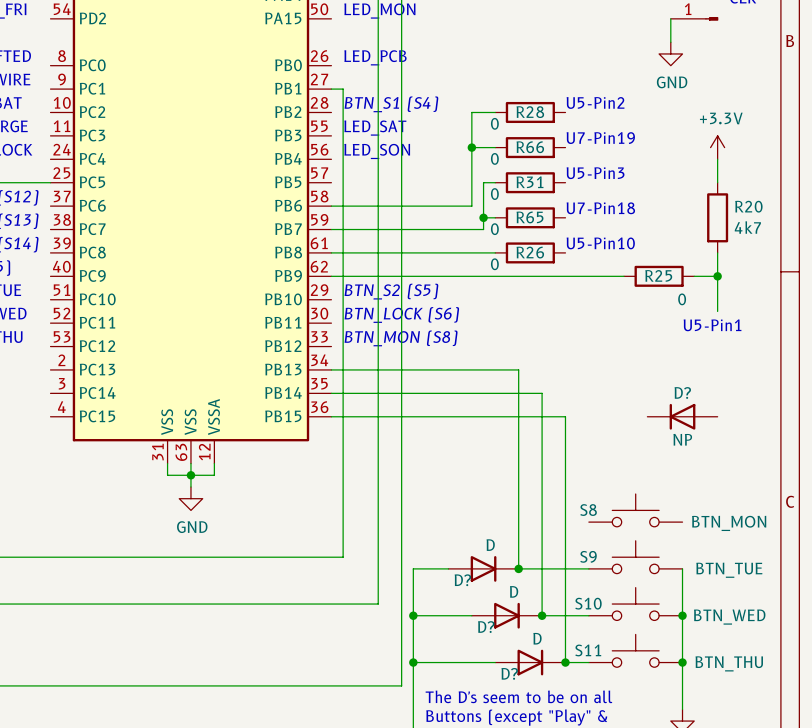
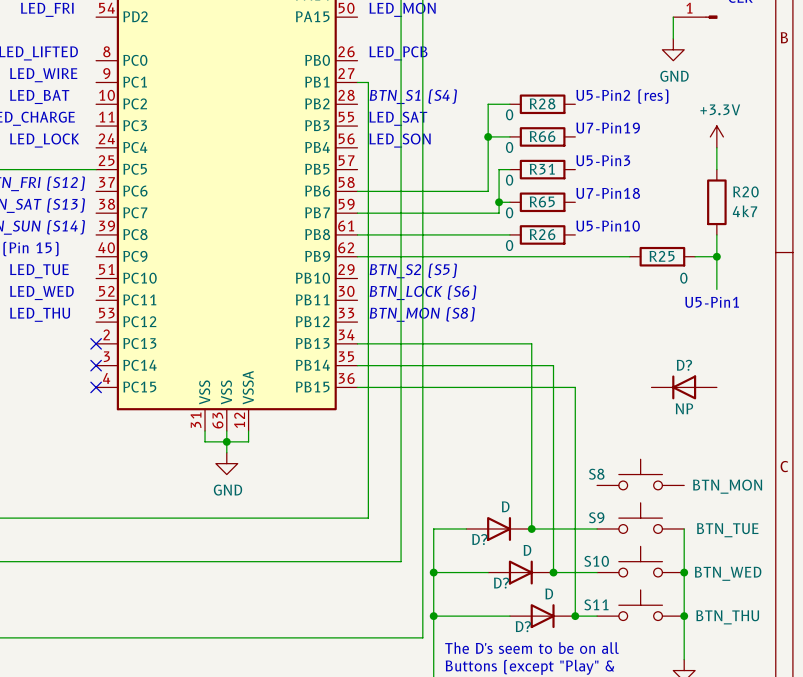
text: U5-Pin2 (595, 102) -> U5-Pin2 (res) (622, 96)
no-connect mark: none -> (96, 343)
no-connect mark: none -> (96, 365)
no-connect mark: none -> (96, 387)

